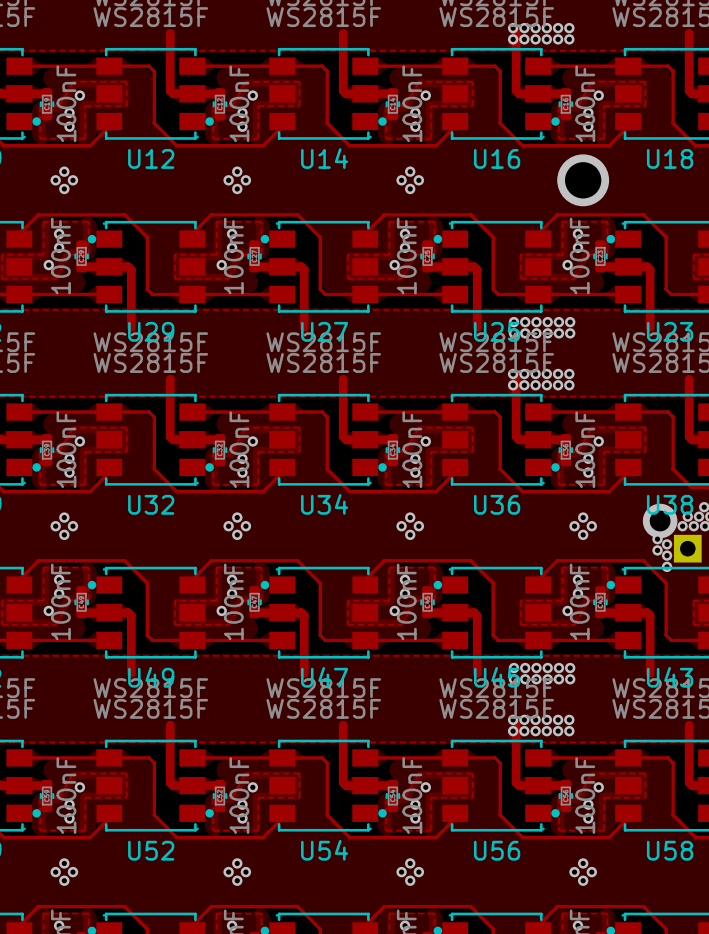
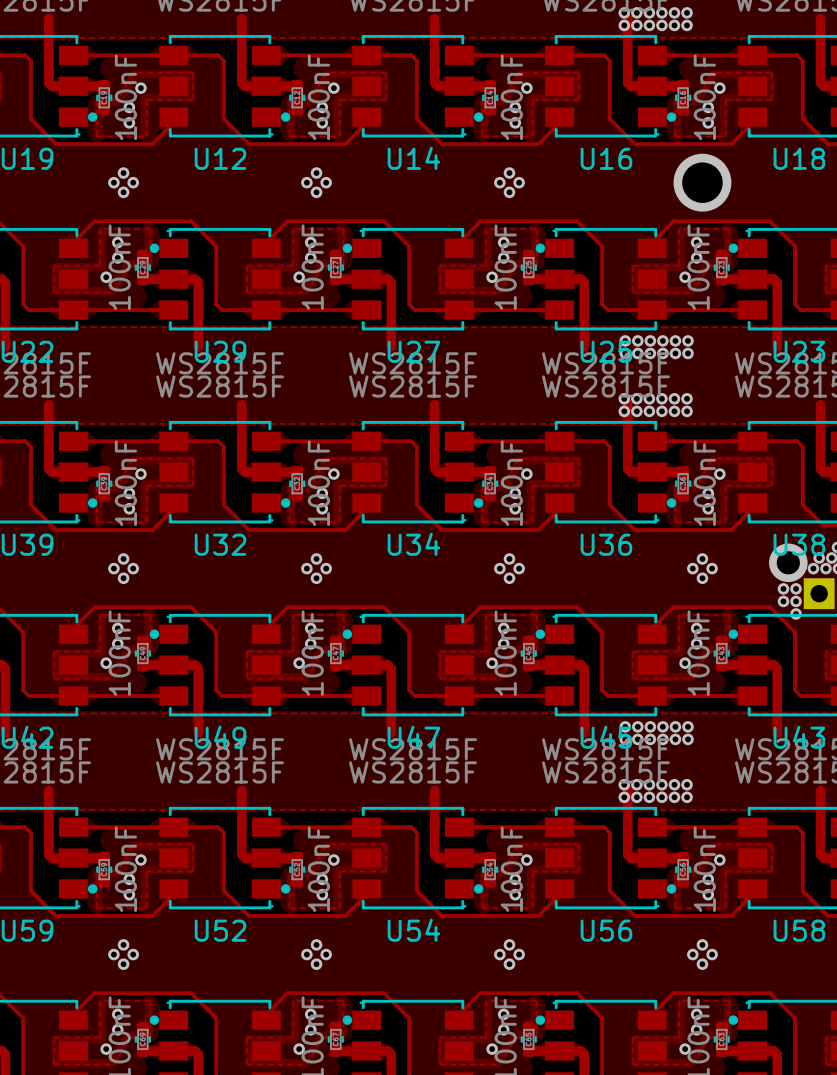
via: (657, 539) -> none
via: none -> (783, 588)
via: (657, 550) -> none
via: none -> (783, 601)

